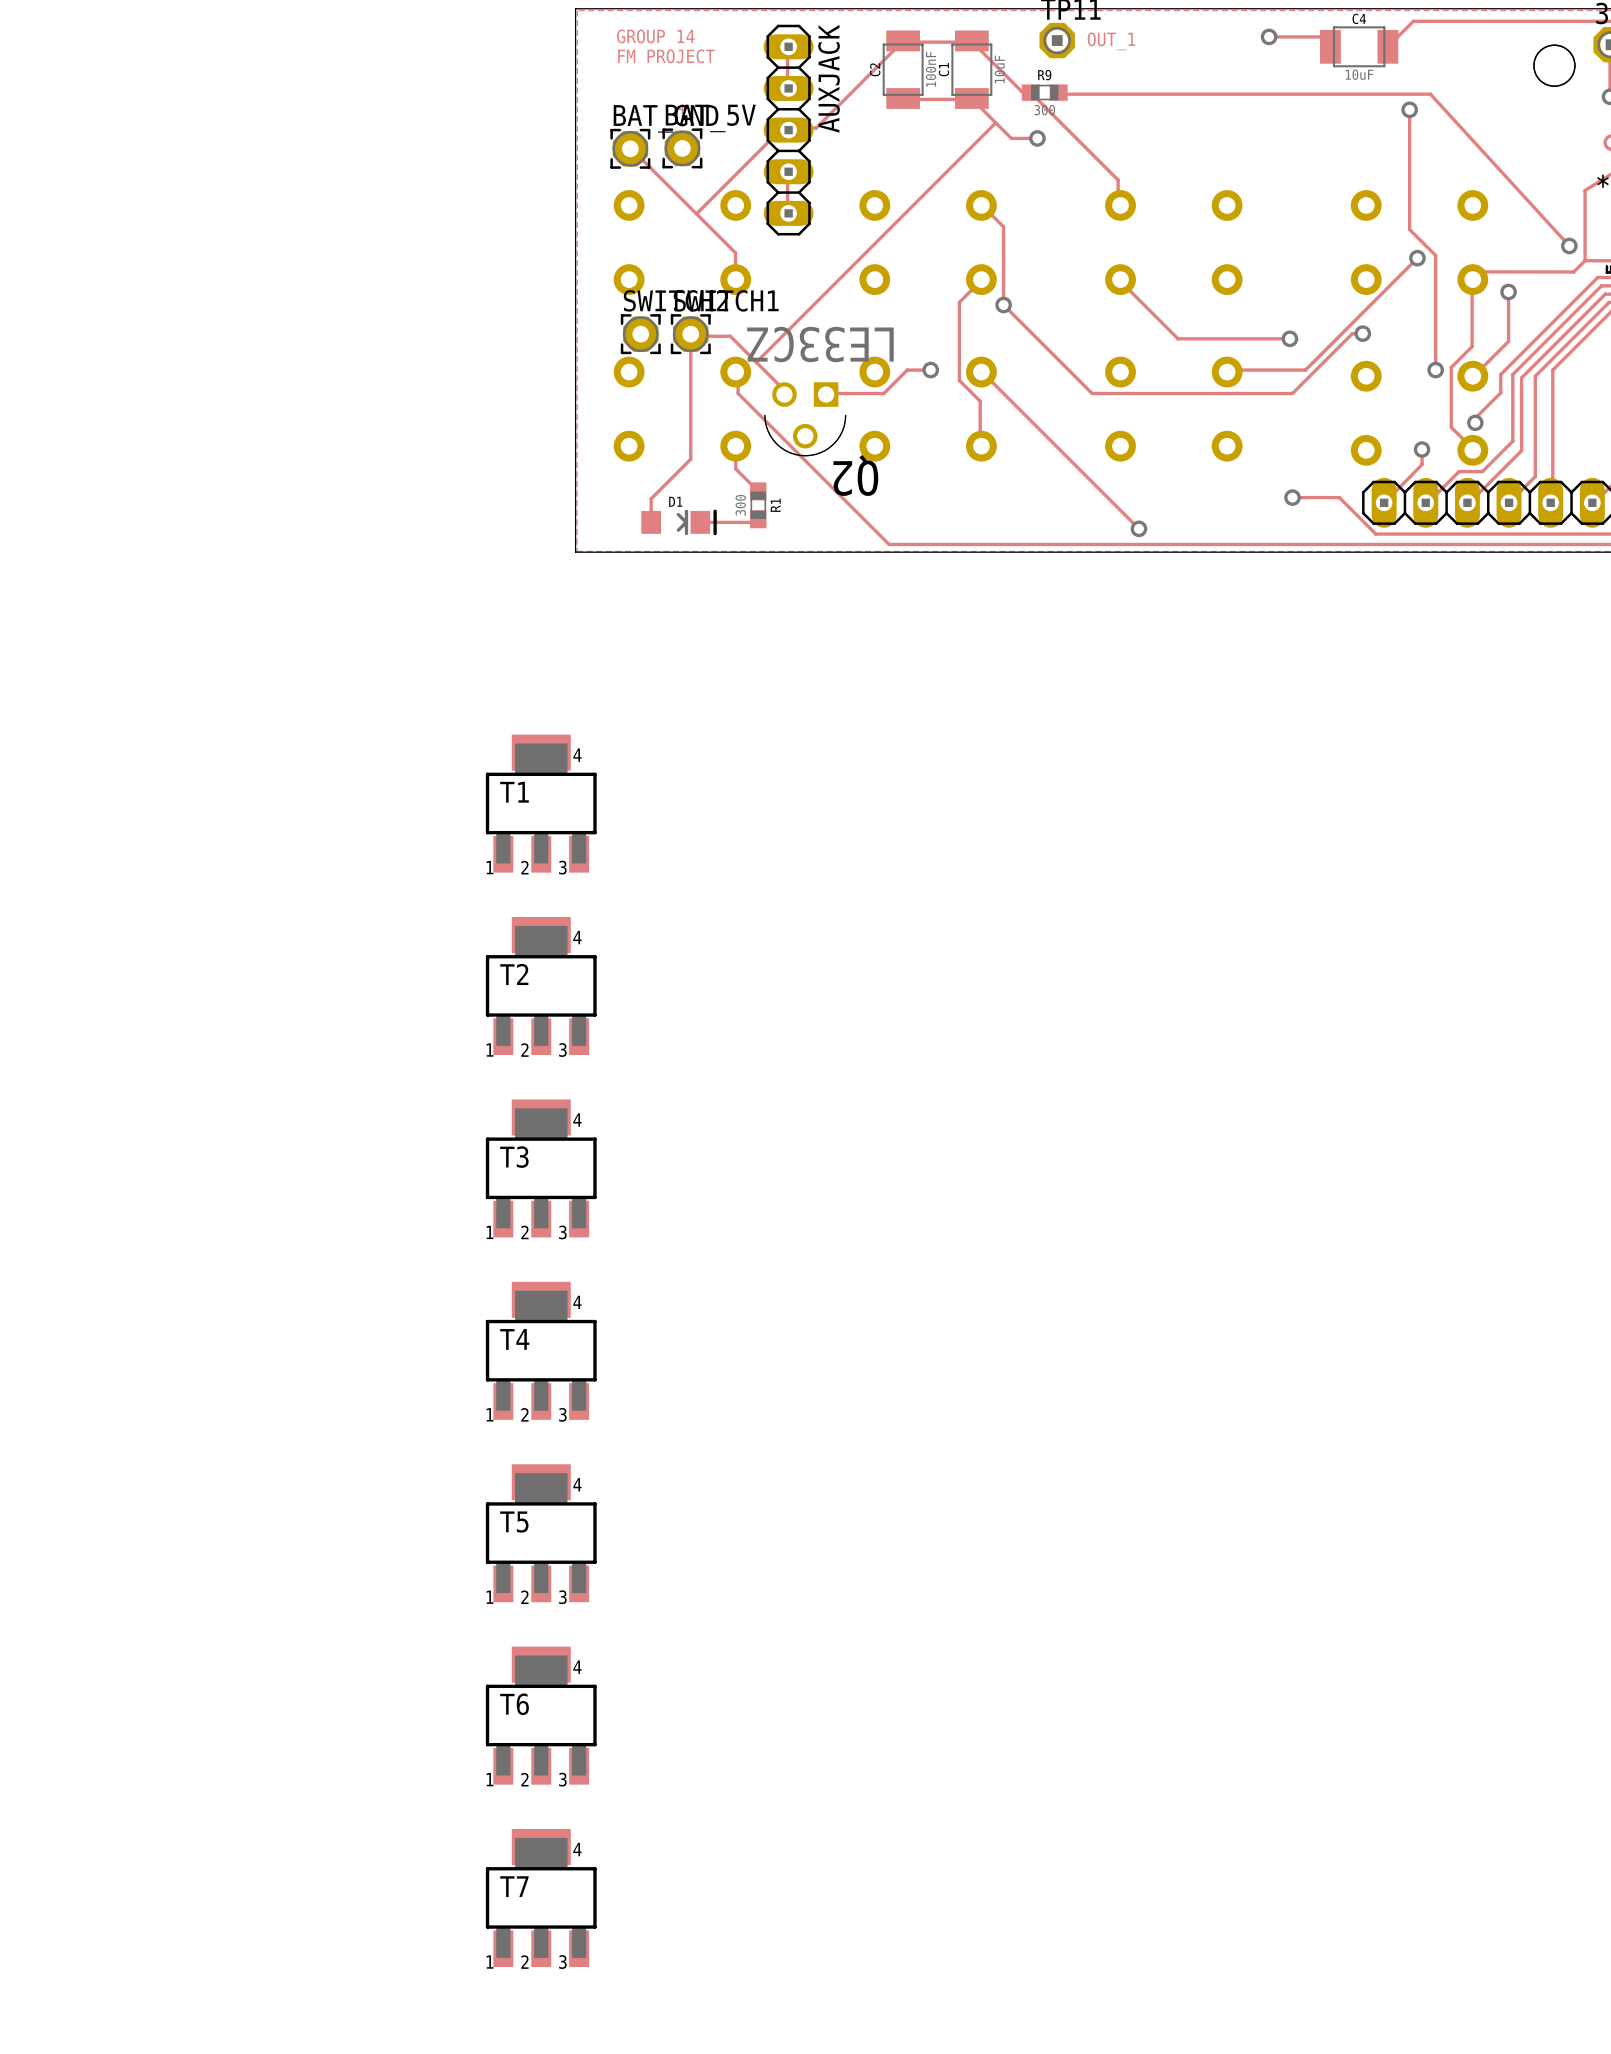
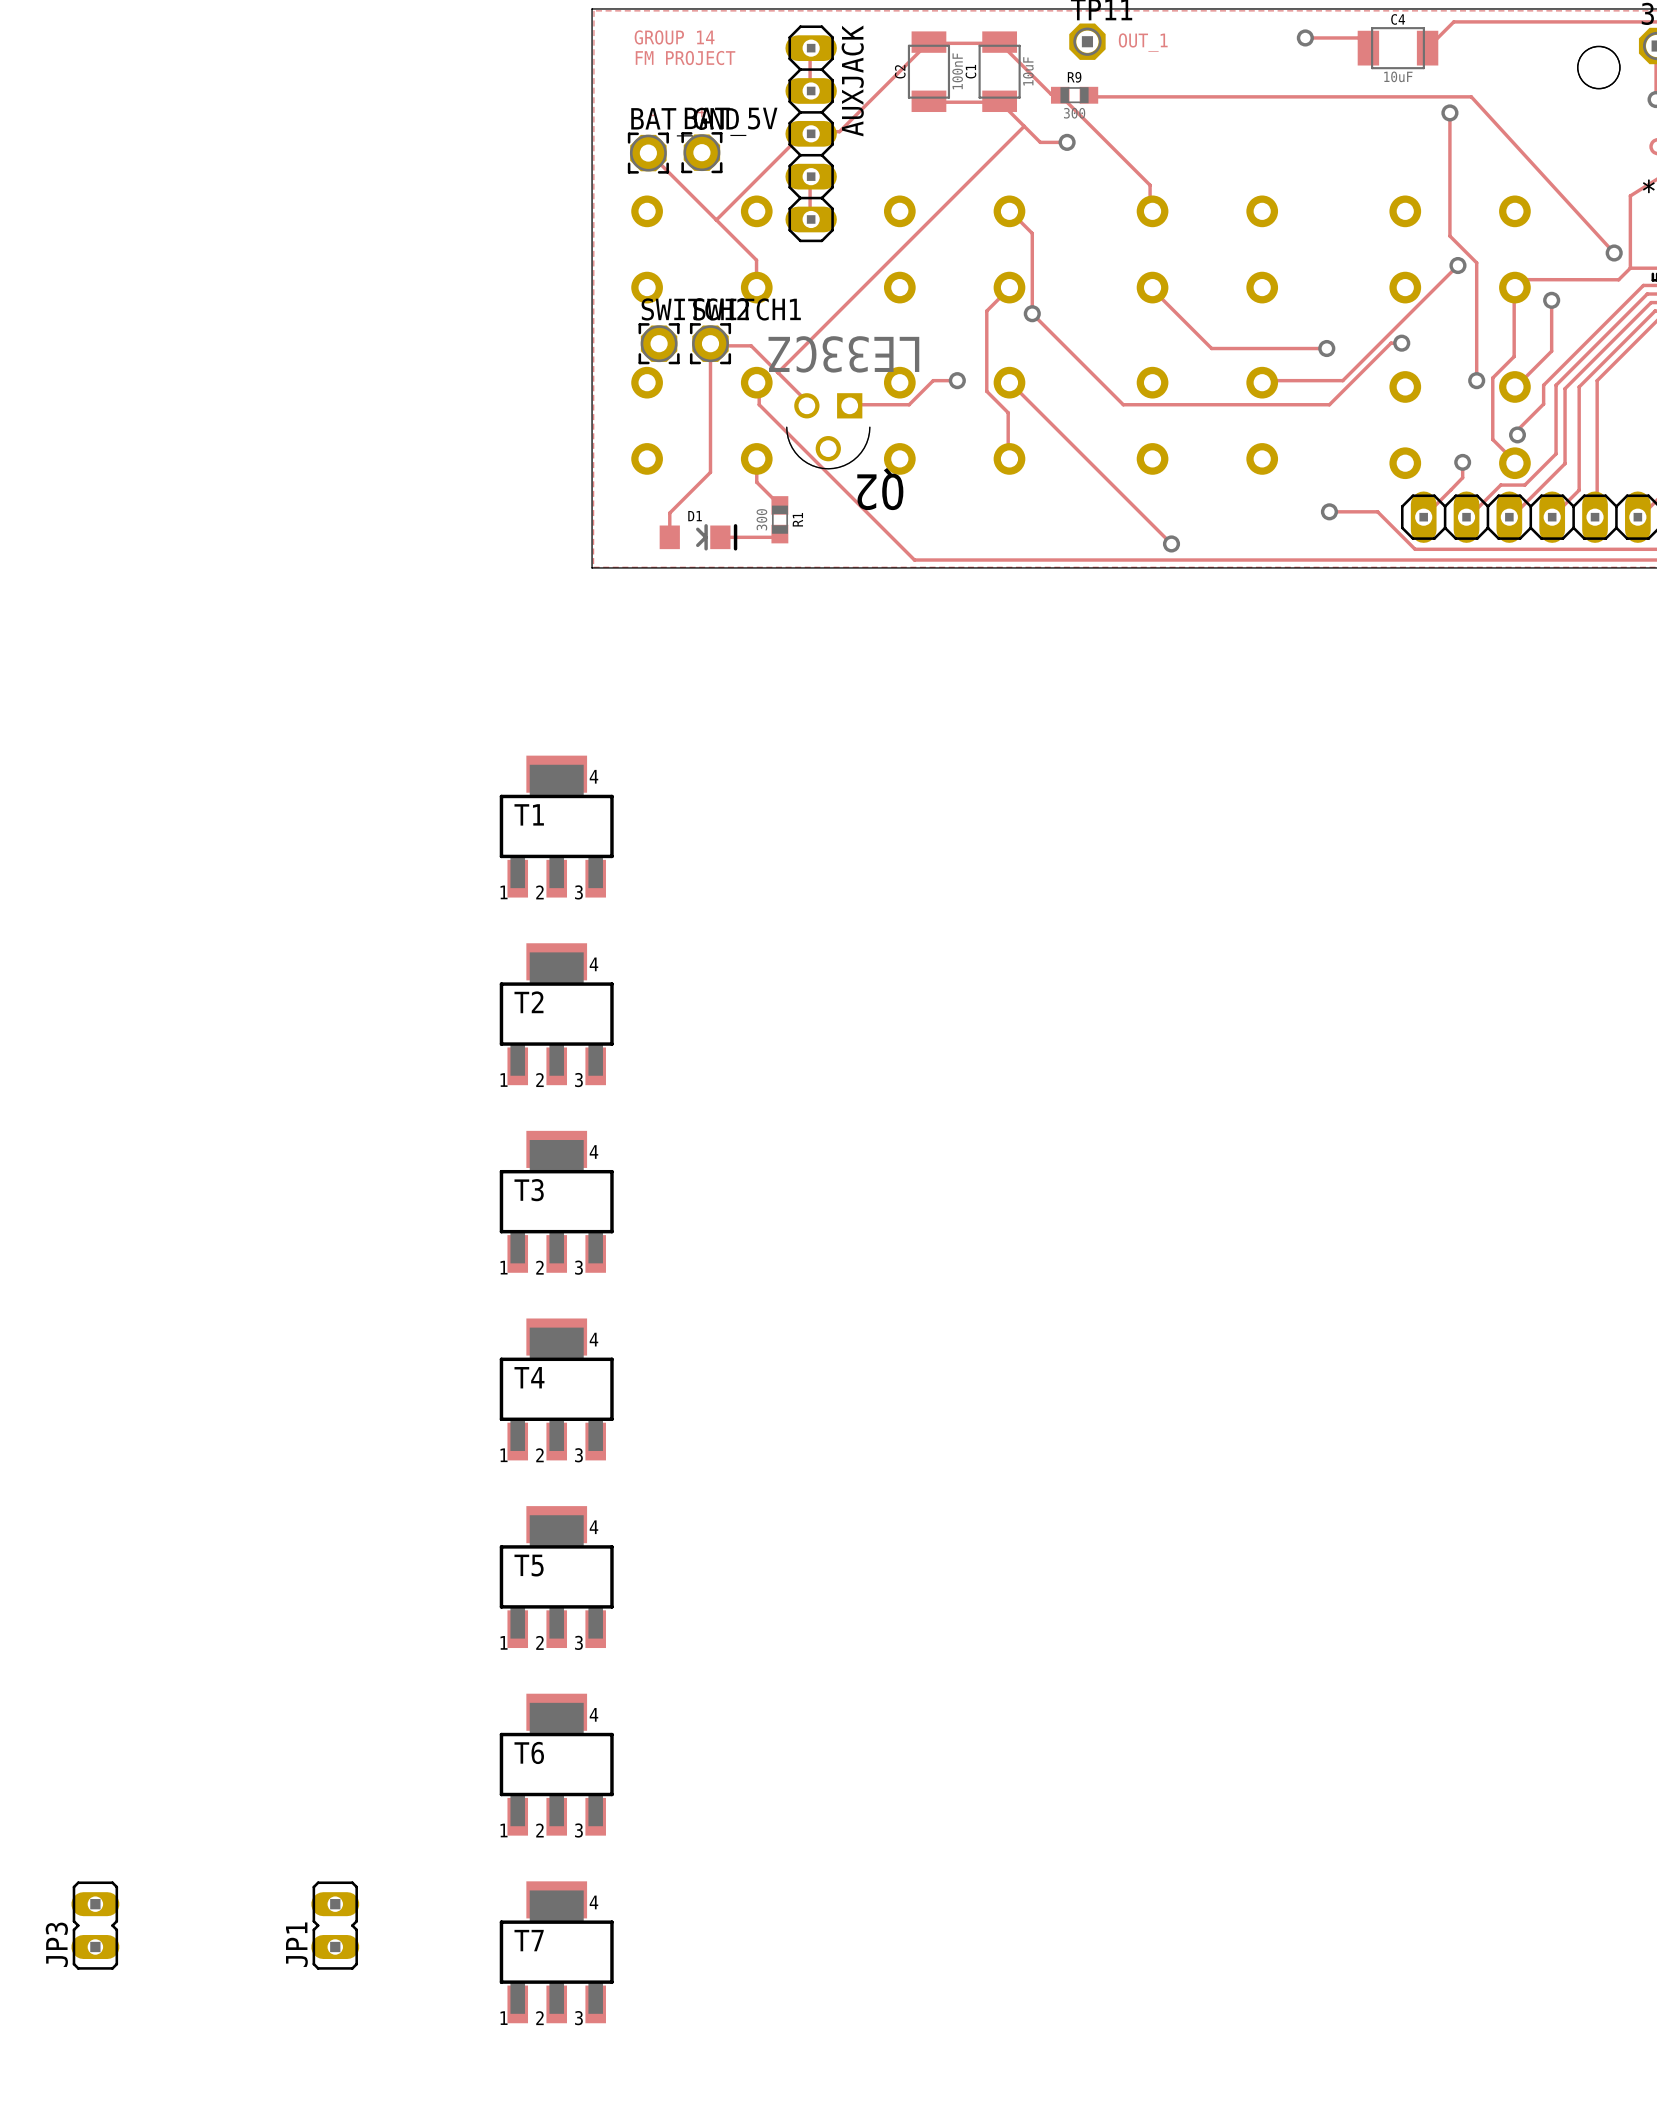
JP3: none -> (95, 1925)
JP1: none -> (335, 1925)

